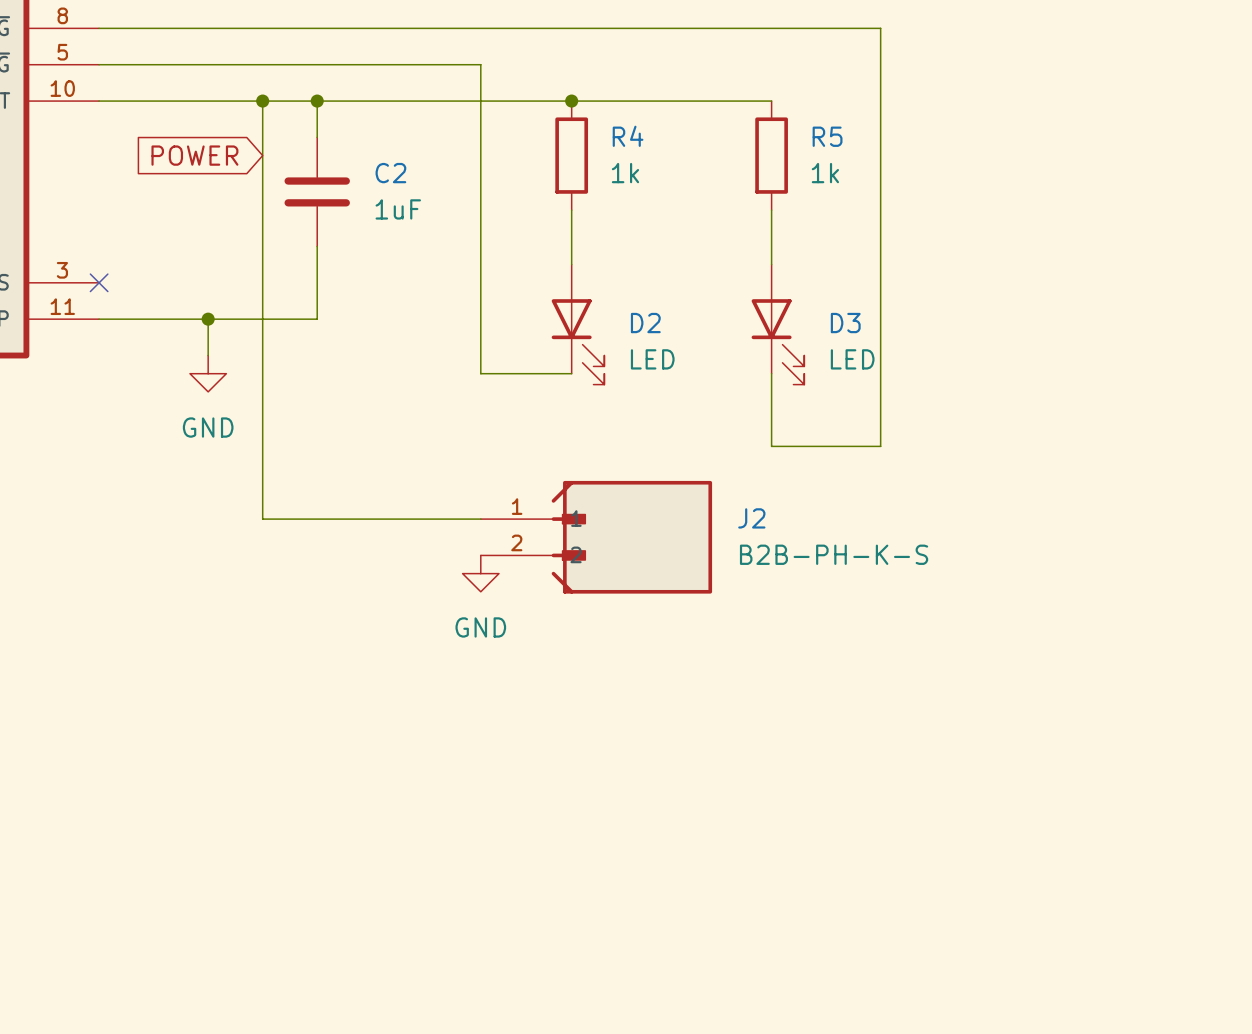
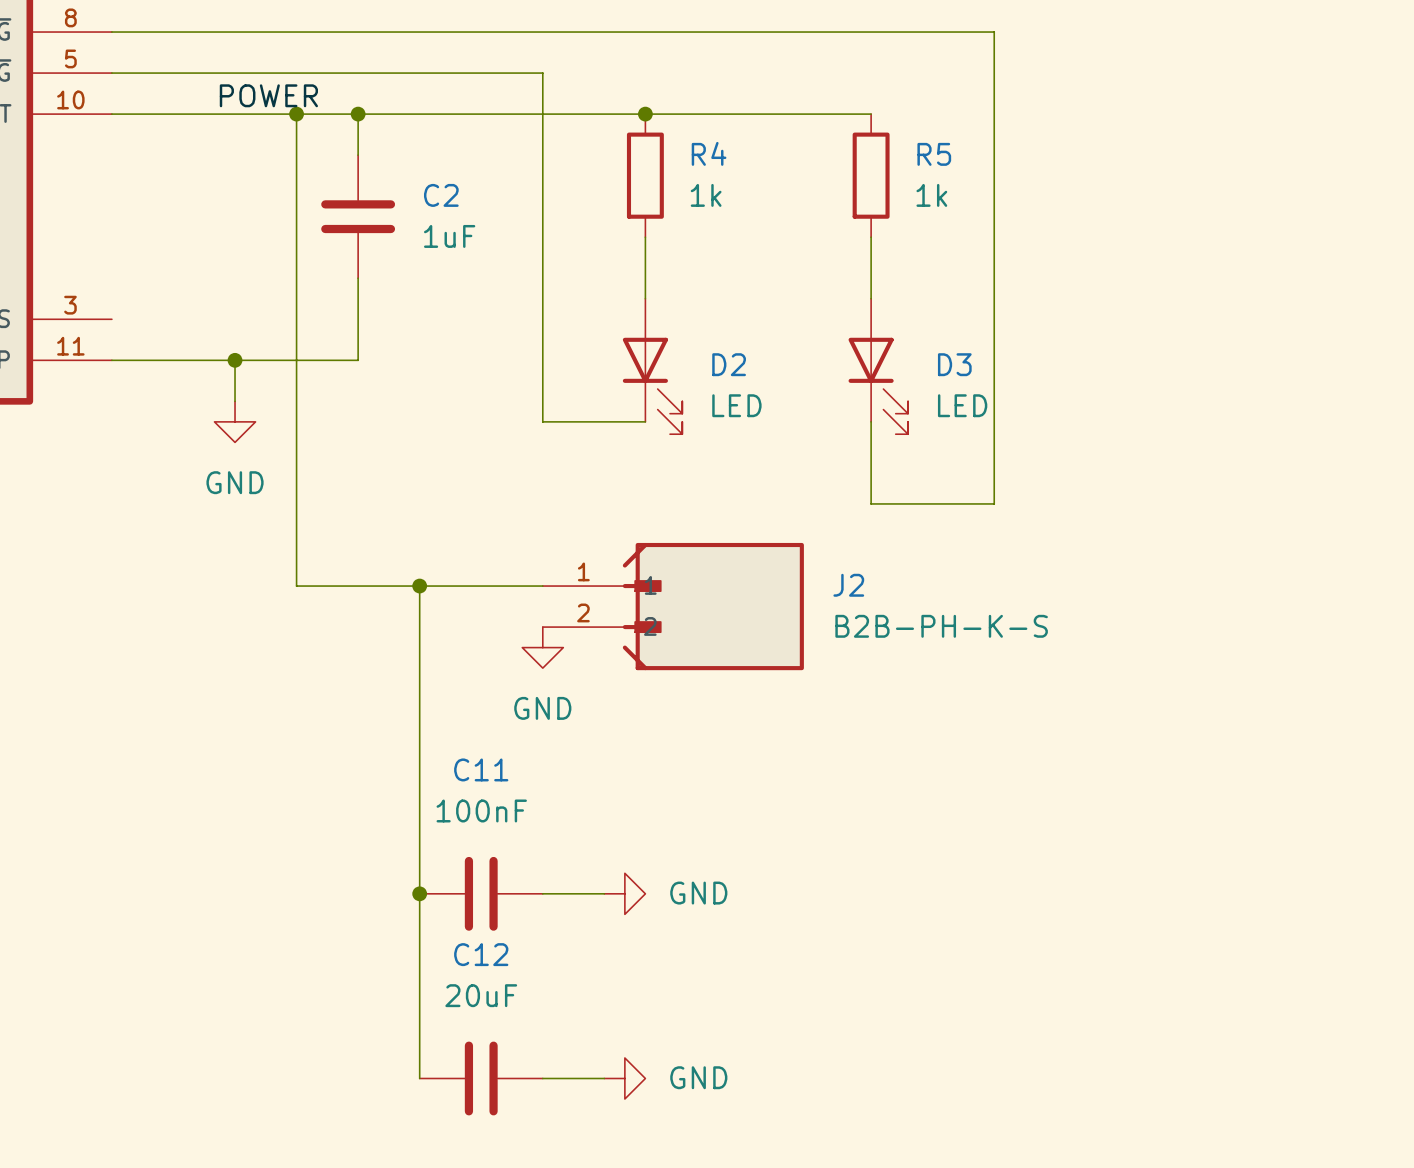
label: none -> POWER (268, 95)
global label: POWER (194, 155) -> none
no-connect mark: (99, 282) -> none
wire: none -> (419, 586) (419, 1078)
junction: none -> (419, 586)
junction: none -> (419, 893)
C11: none -> 100nF (481, 893)
wire: none -> (542, 893) (604, 893)
power symbol: none -> GND (624, 893)
C12: none -> 20uF (481, 1078)
wire: none -> (542, 1078) (604, 1078)
power symbol: none -> GND (624, 1078)

